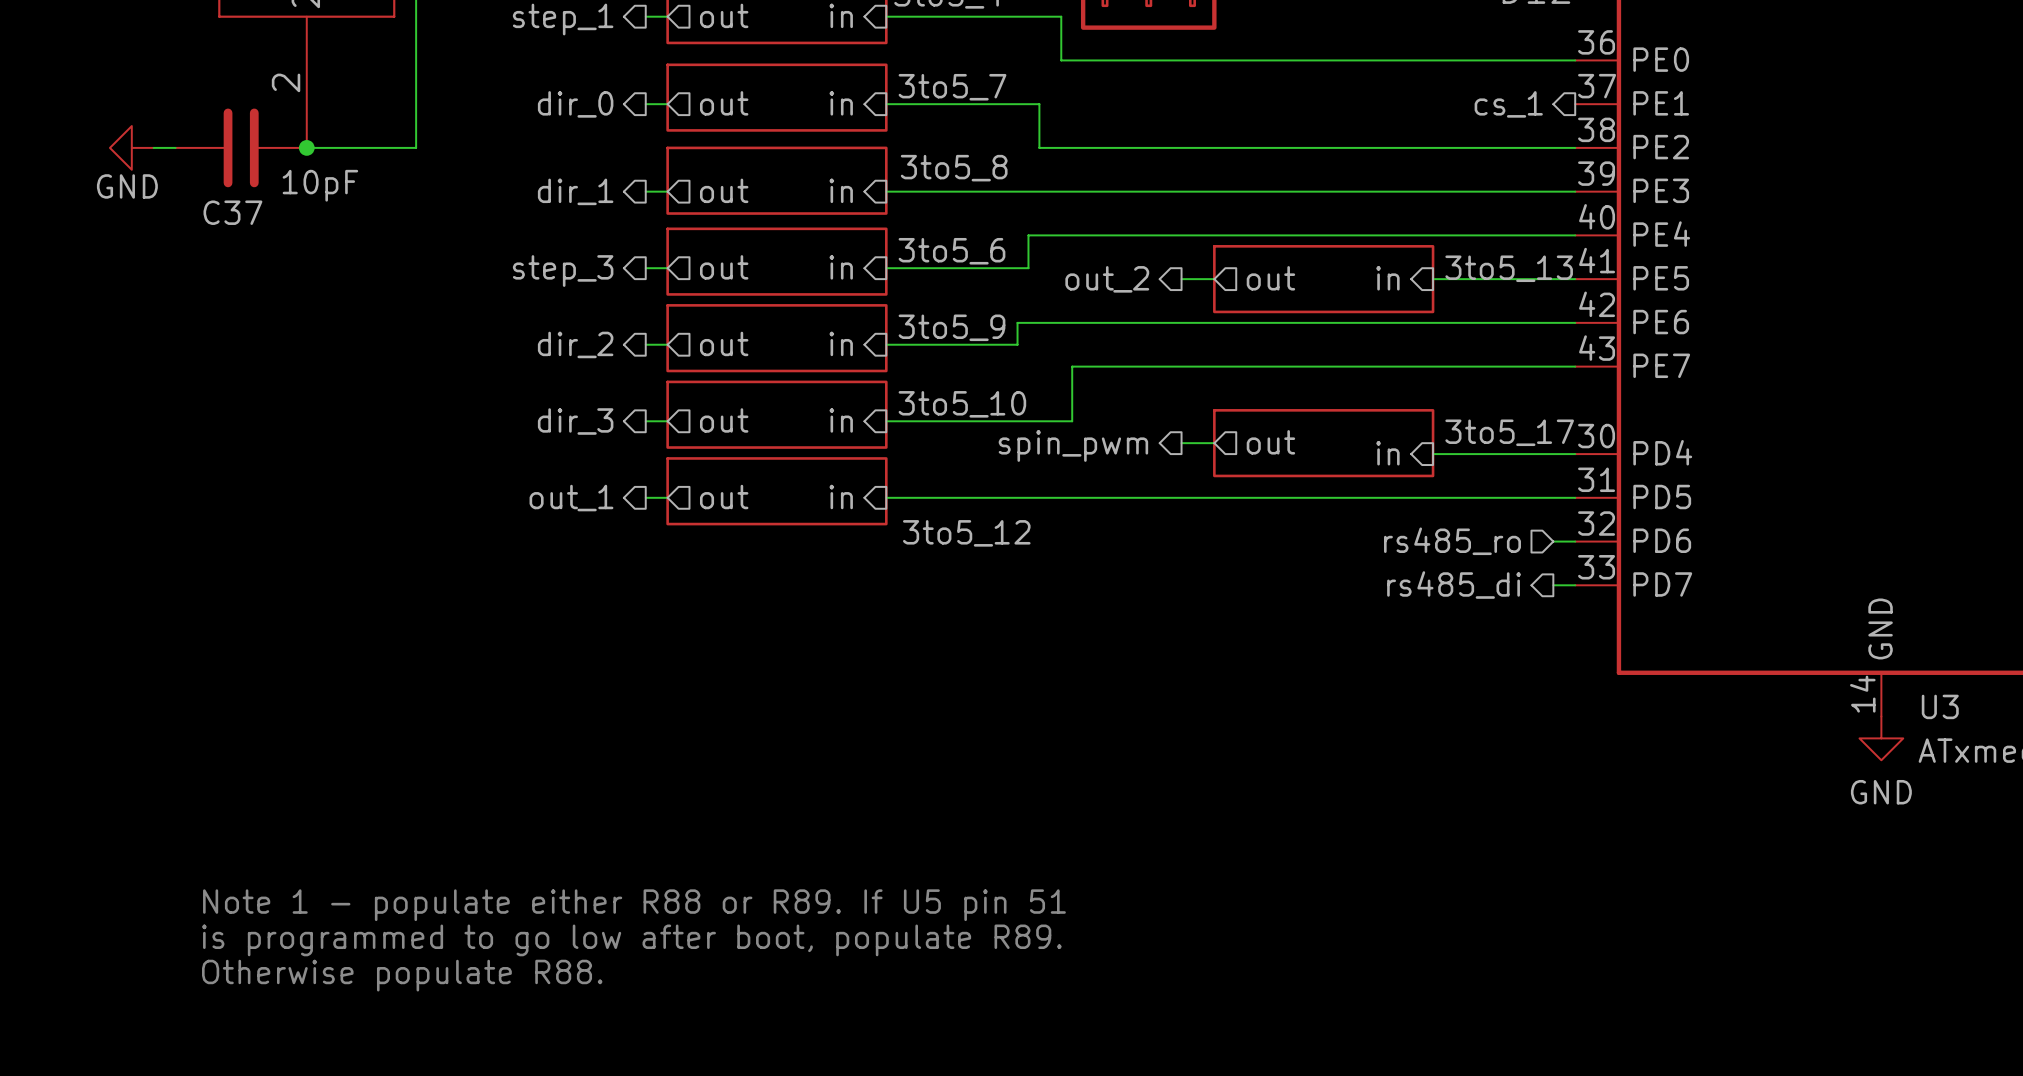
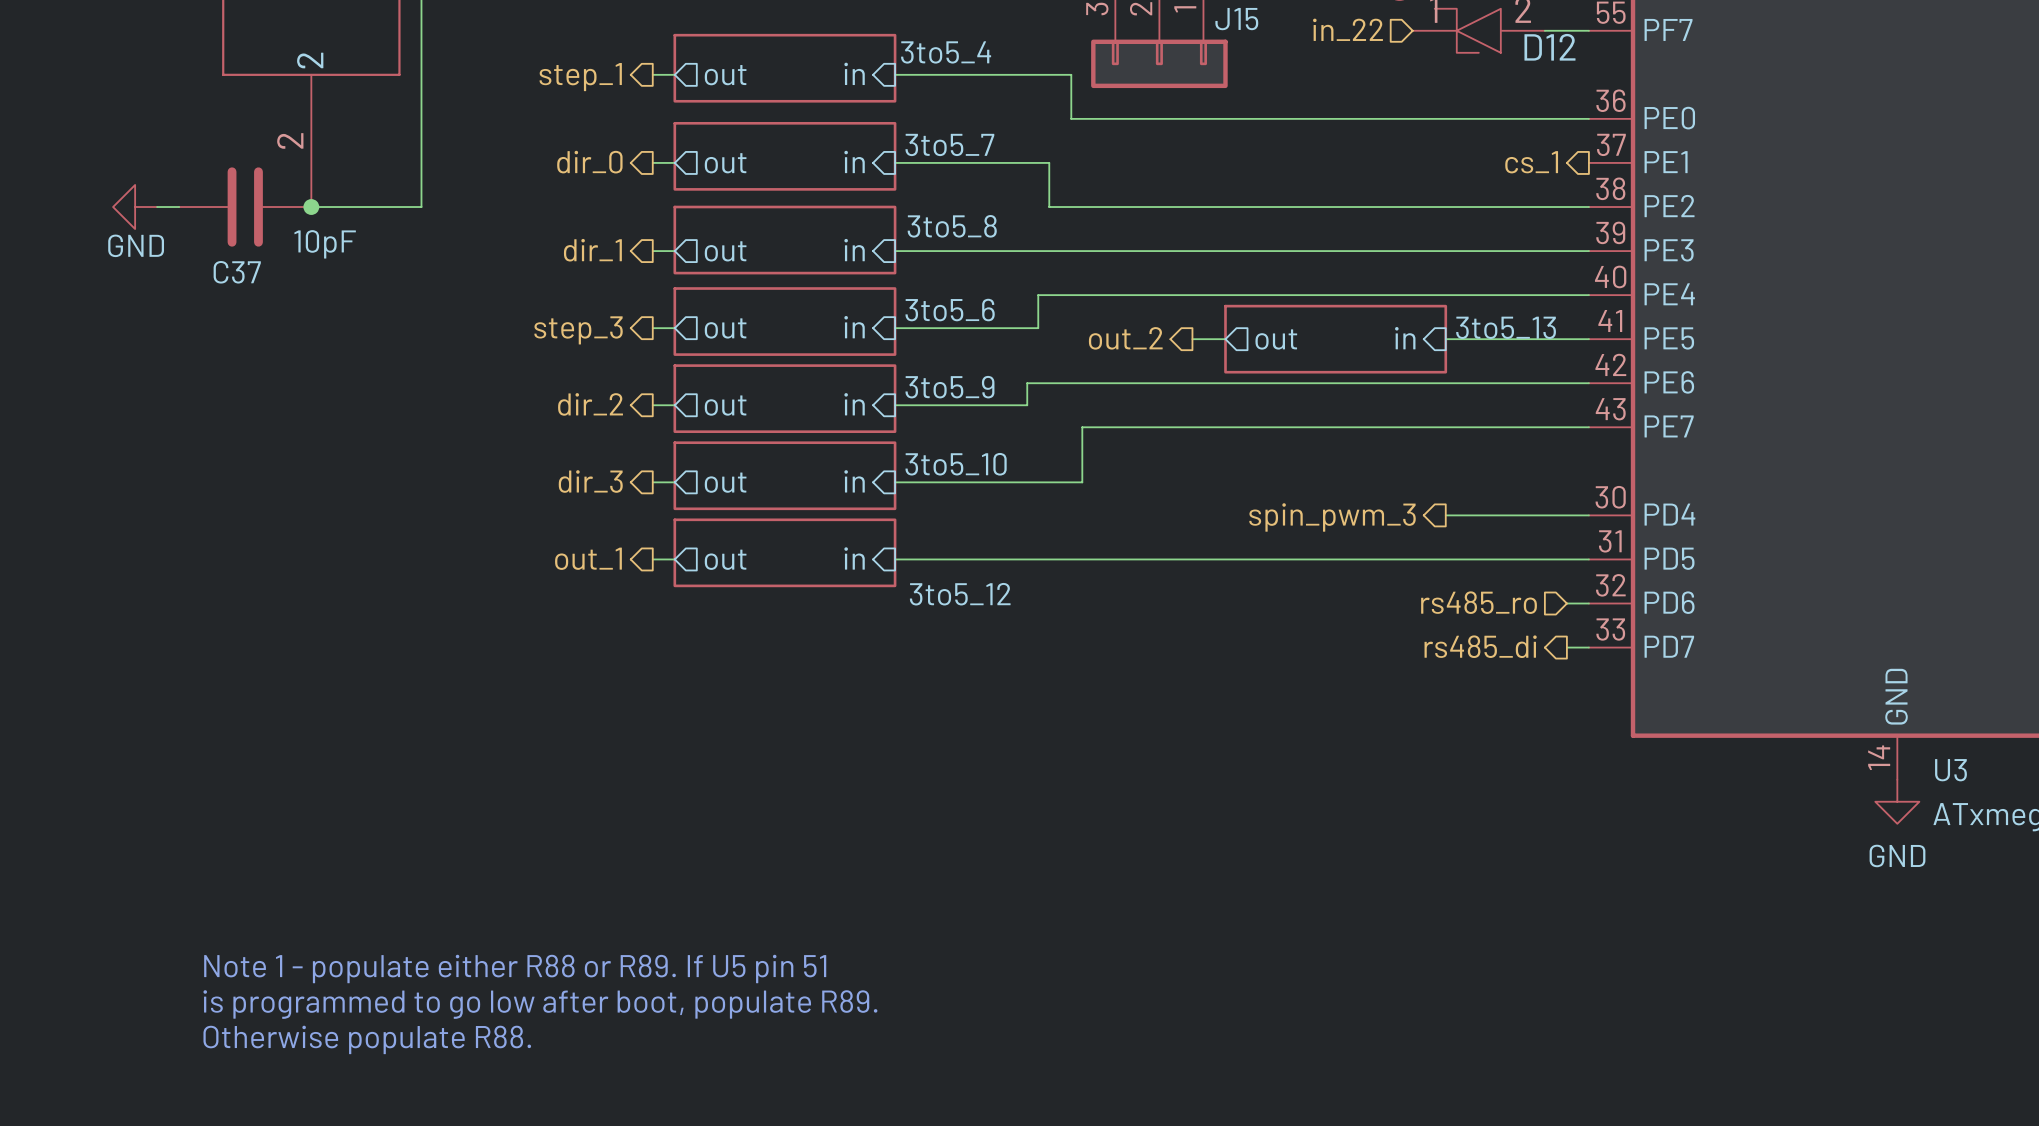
sheet pin: out (1270, 442) -> none
wire: (1181, 443) (1214, 443) -> none
sheet 3to5_17: (1323, 443) -> none
hierarchical label: spin_pwm (1073, 445) -> none
sheet pin: in (1387, 453) -> none
hierarchical label: none -> spin_pwm_3 (1332, 517)

